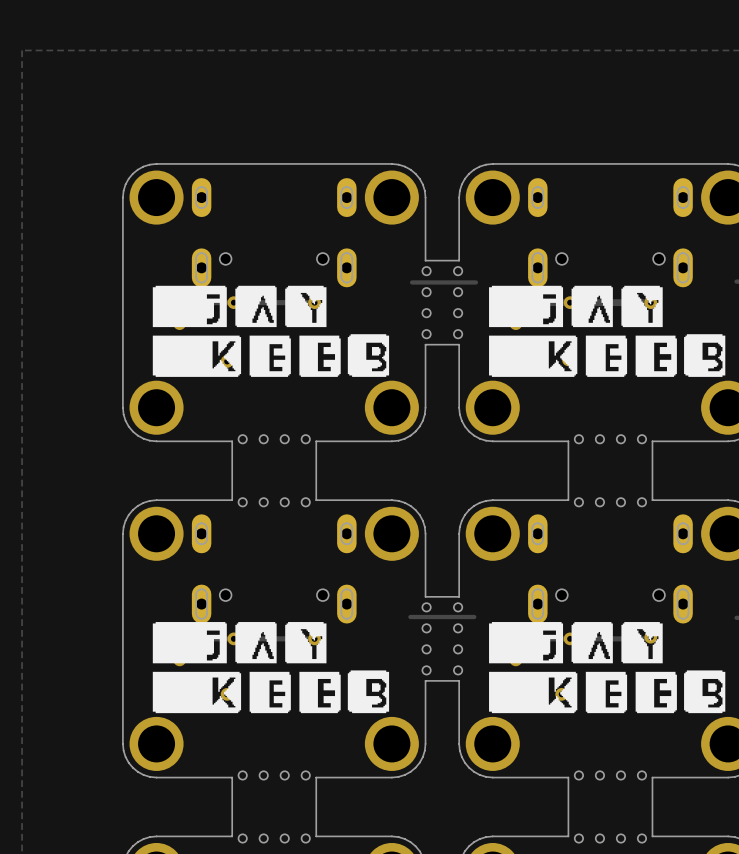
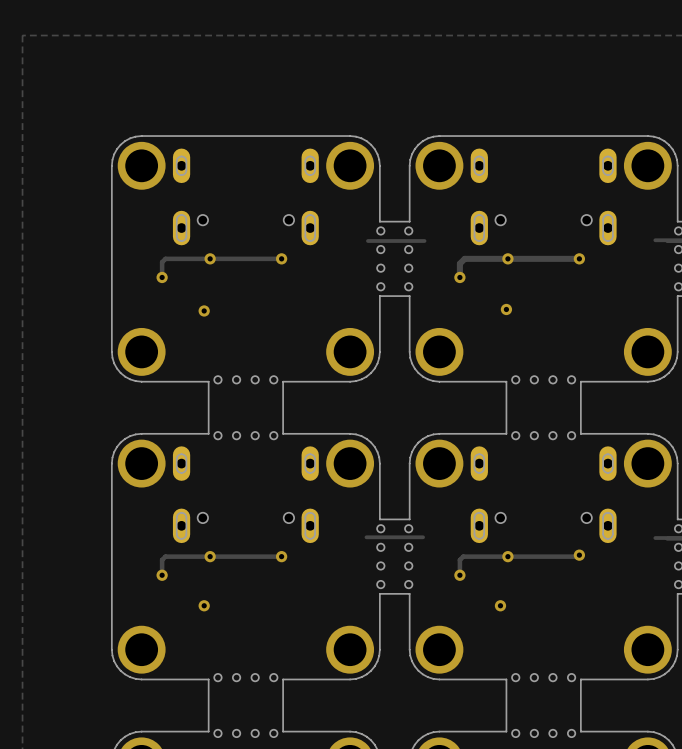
drawing: [152, 285, 390, 377] -> none
drawing: [489, 285, 726, 377] -> none
drawing: [152, 622, 390, 714] -> none
drawing: [489, 622, 726, 714] -> none

